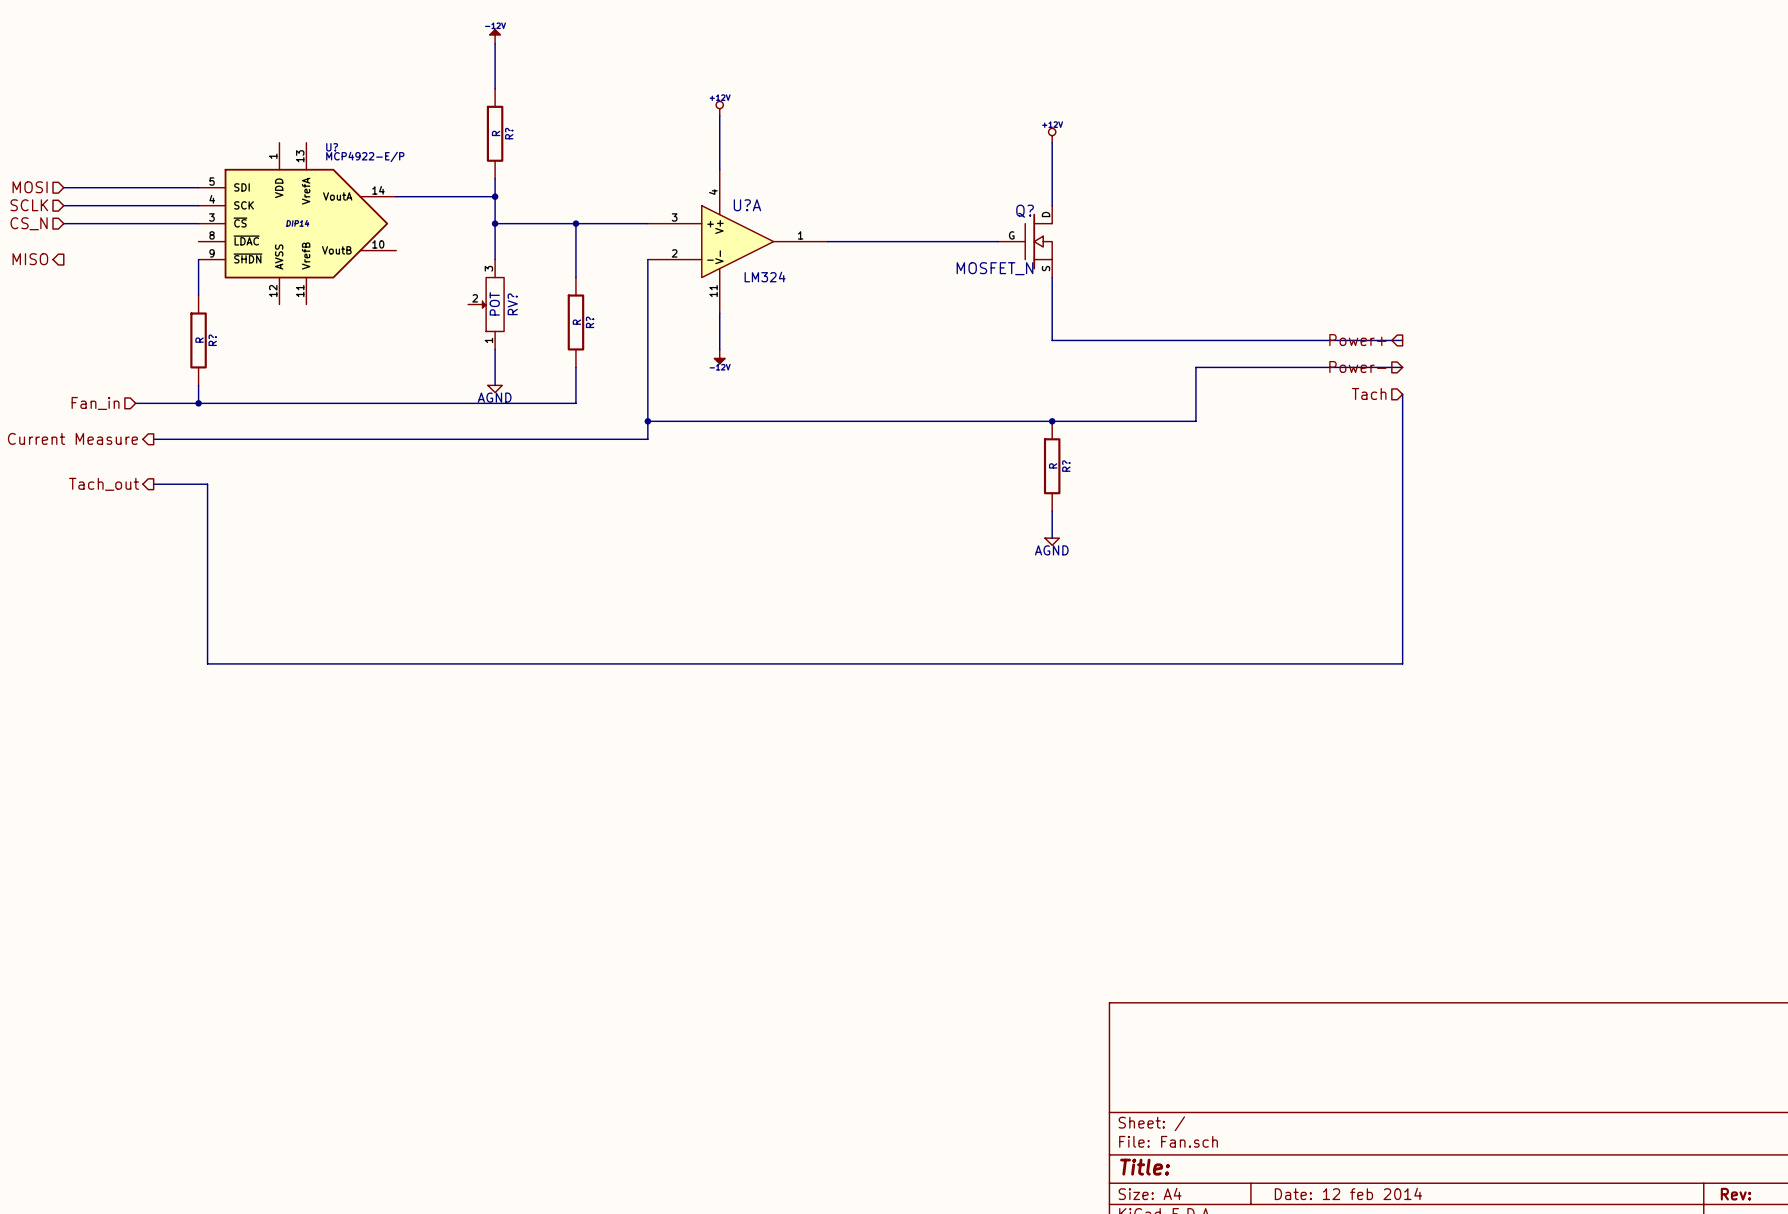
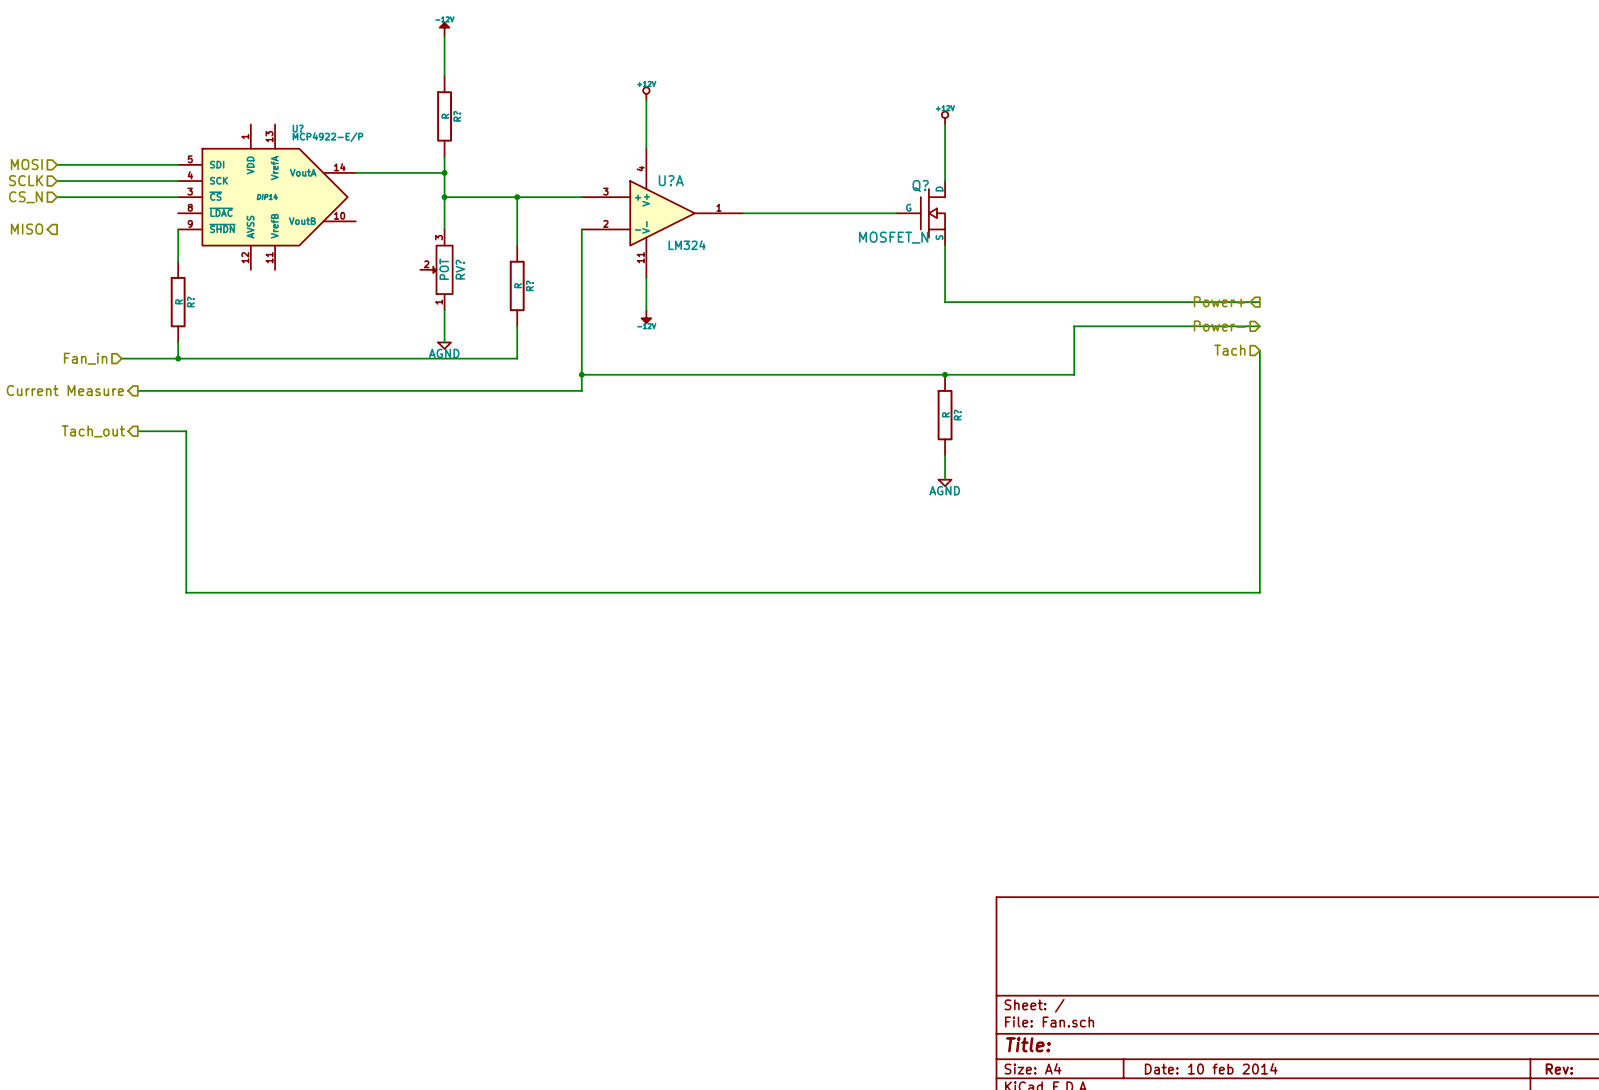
title block: Date: 12 feb 2014 (1348, 1193) -> Date: 10 feb 2014 (1211, 1068)

